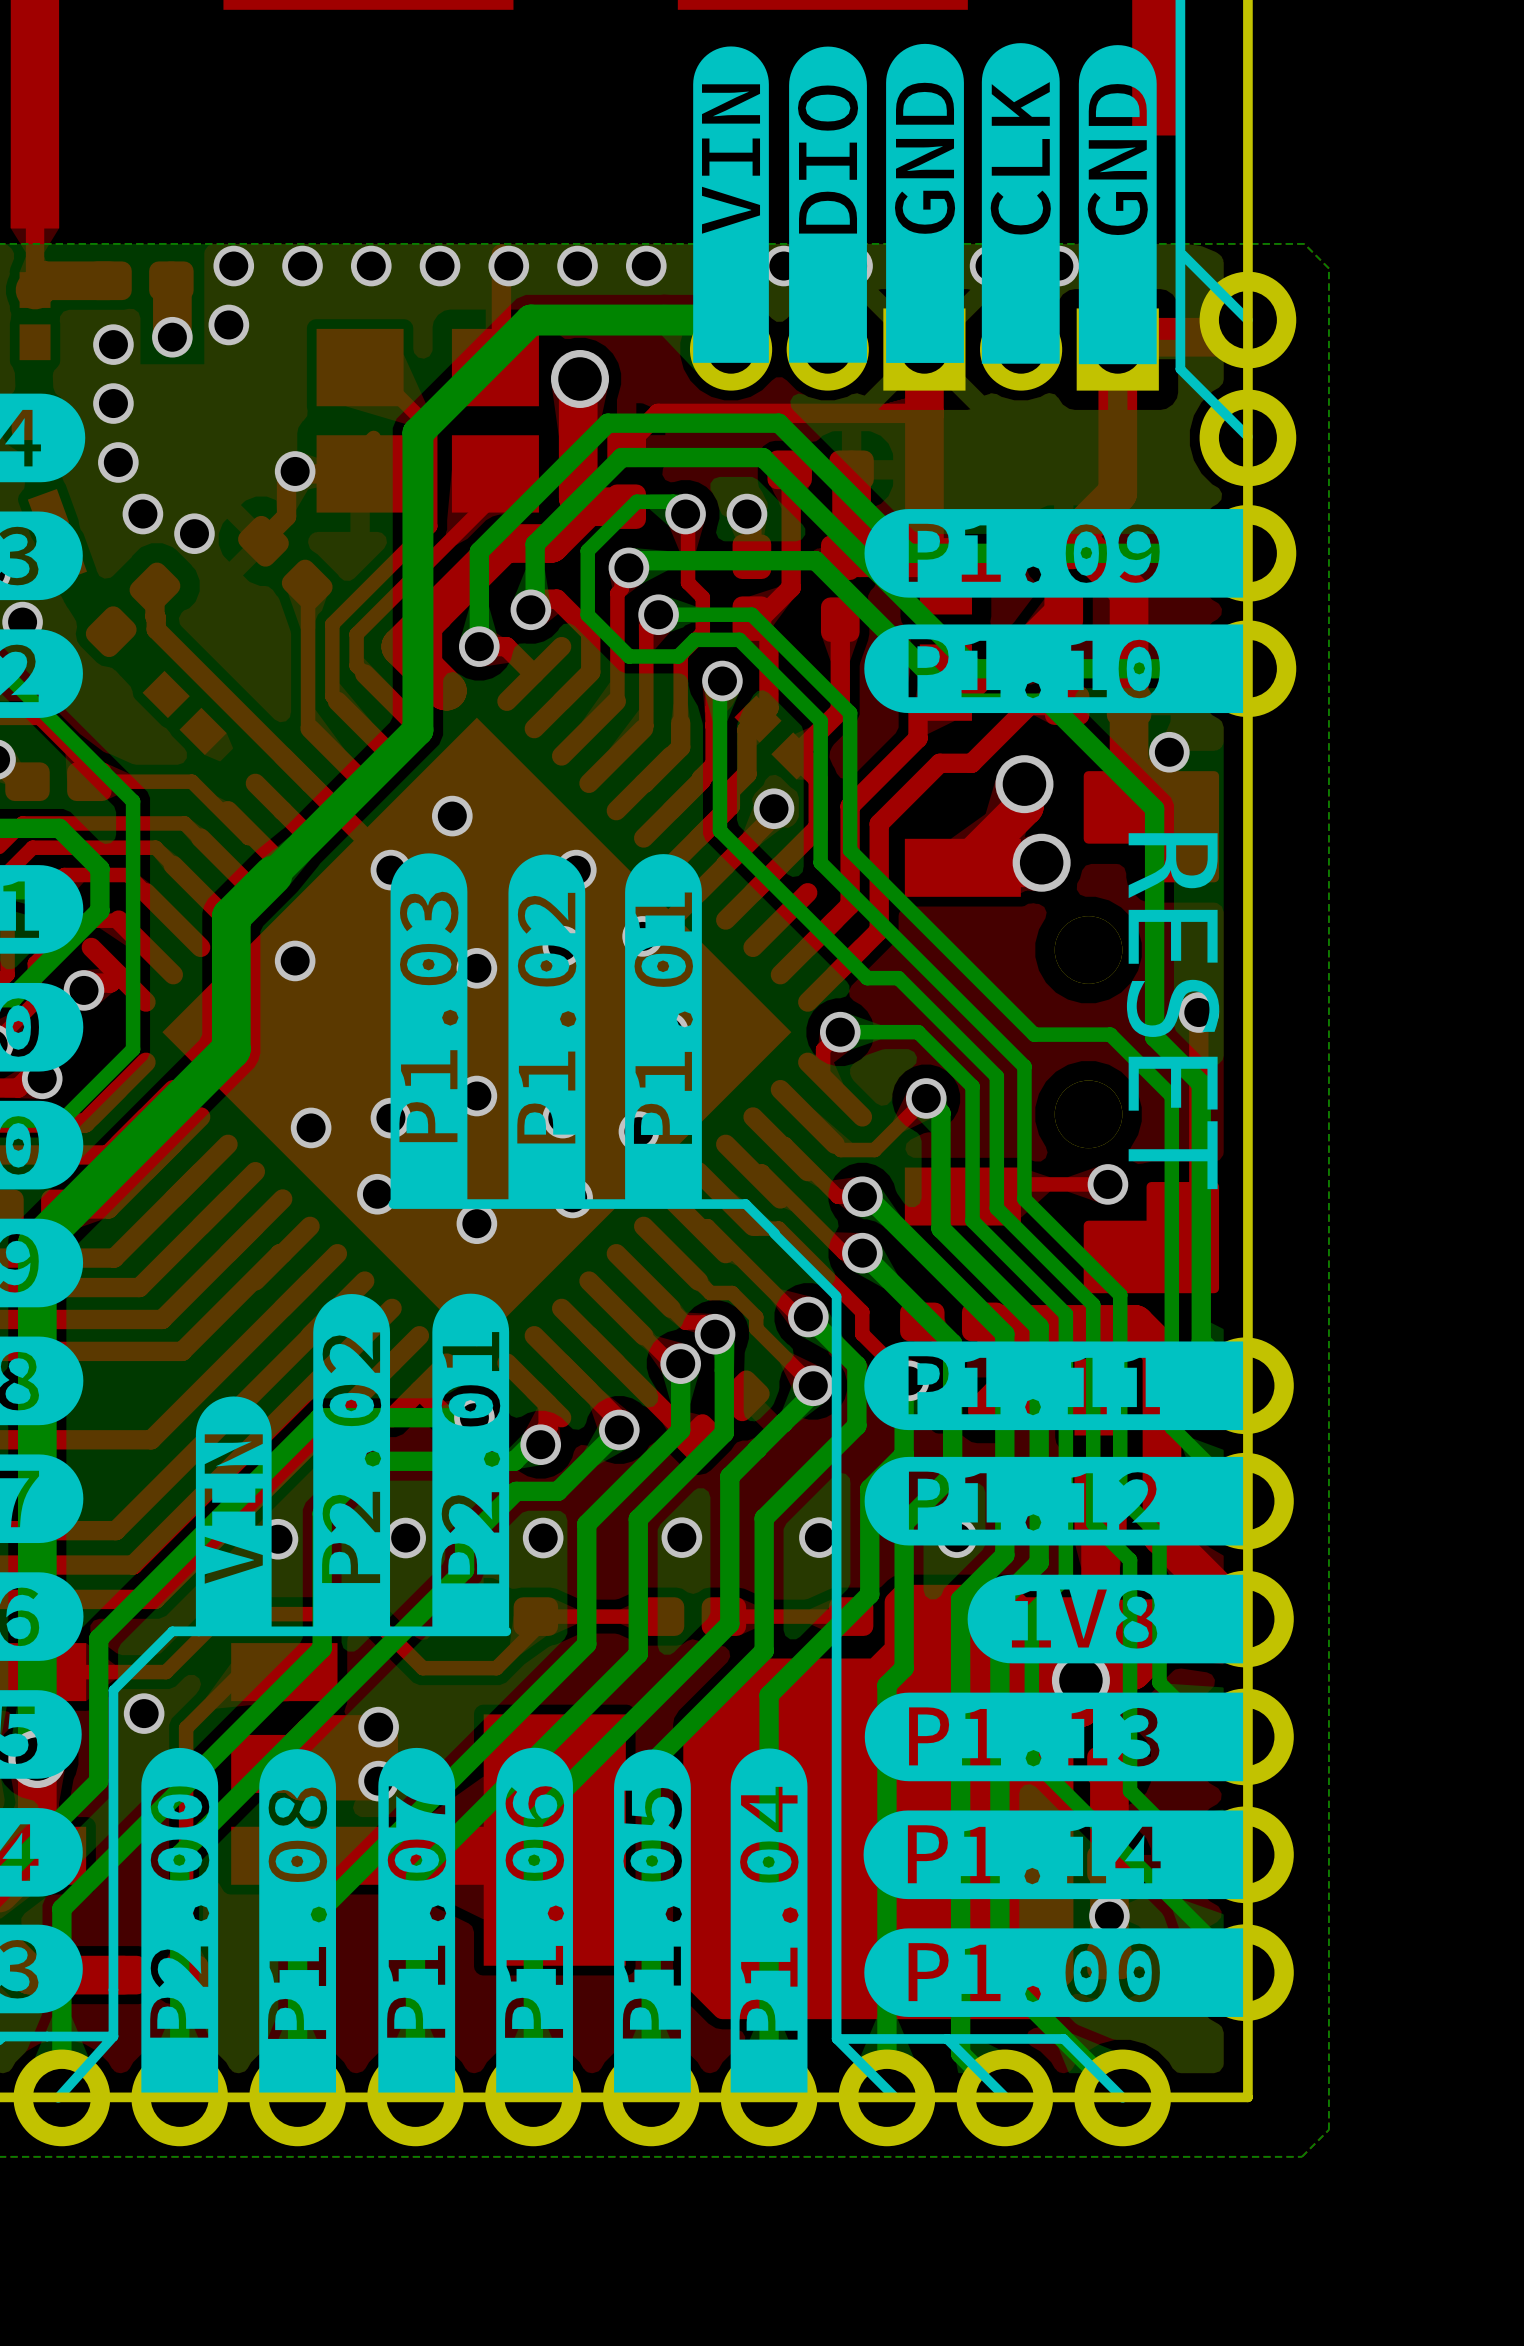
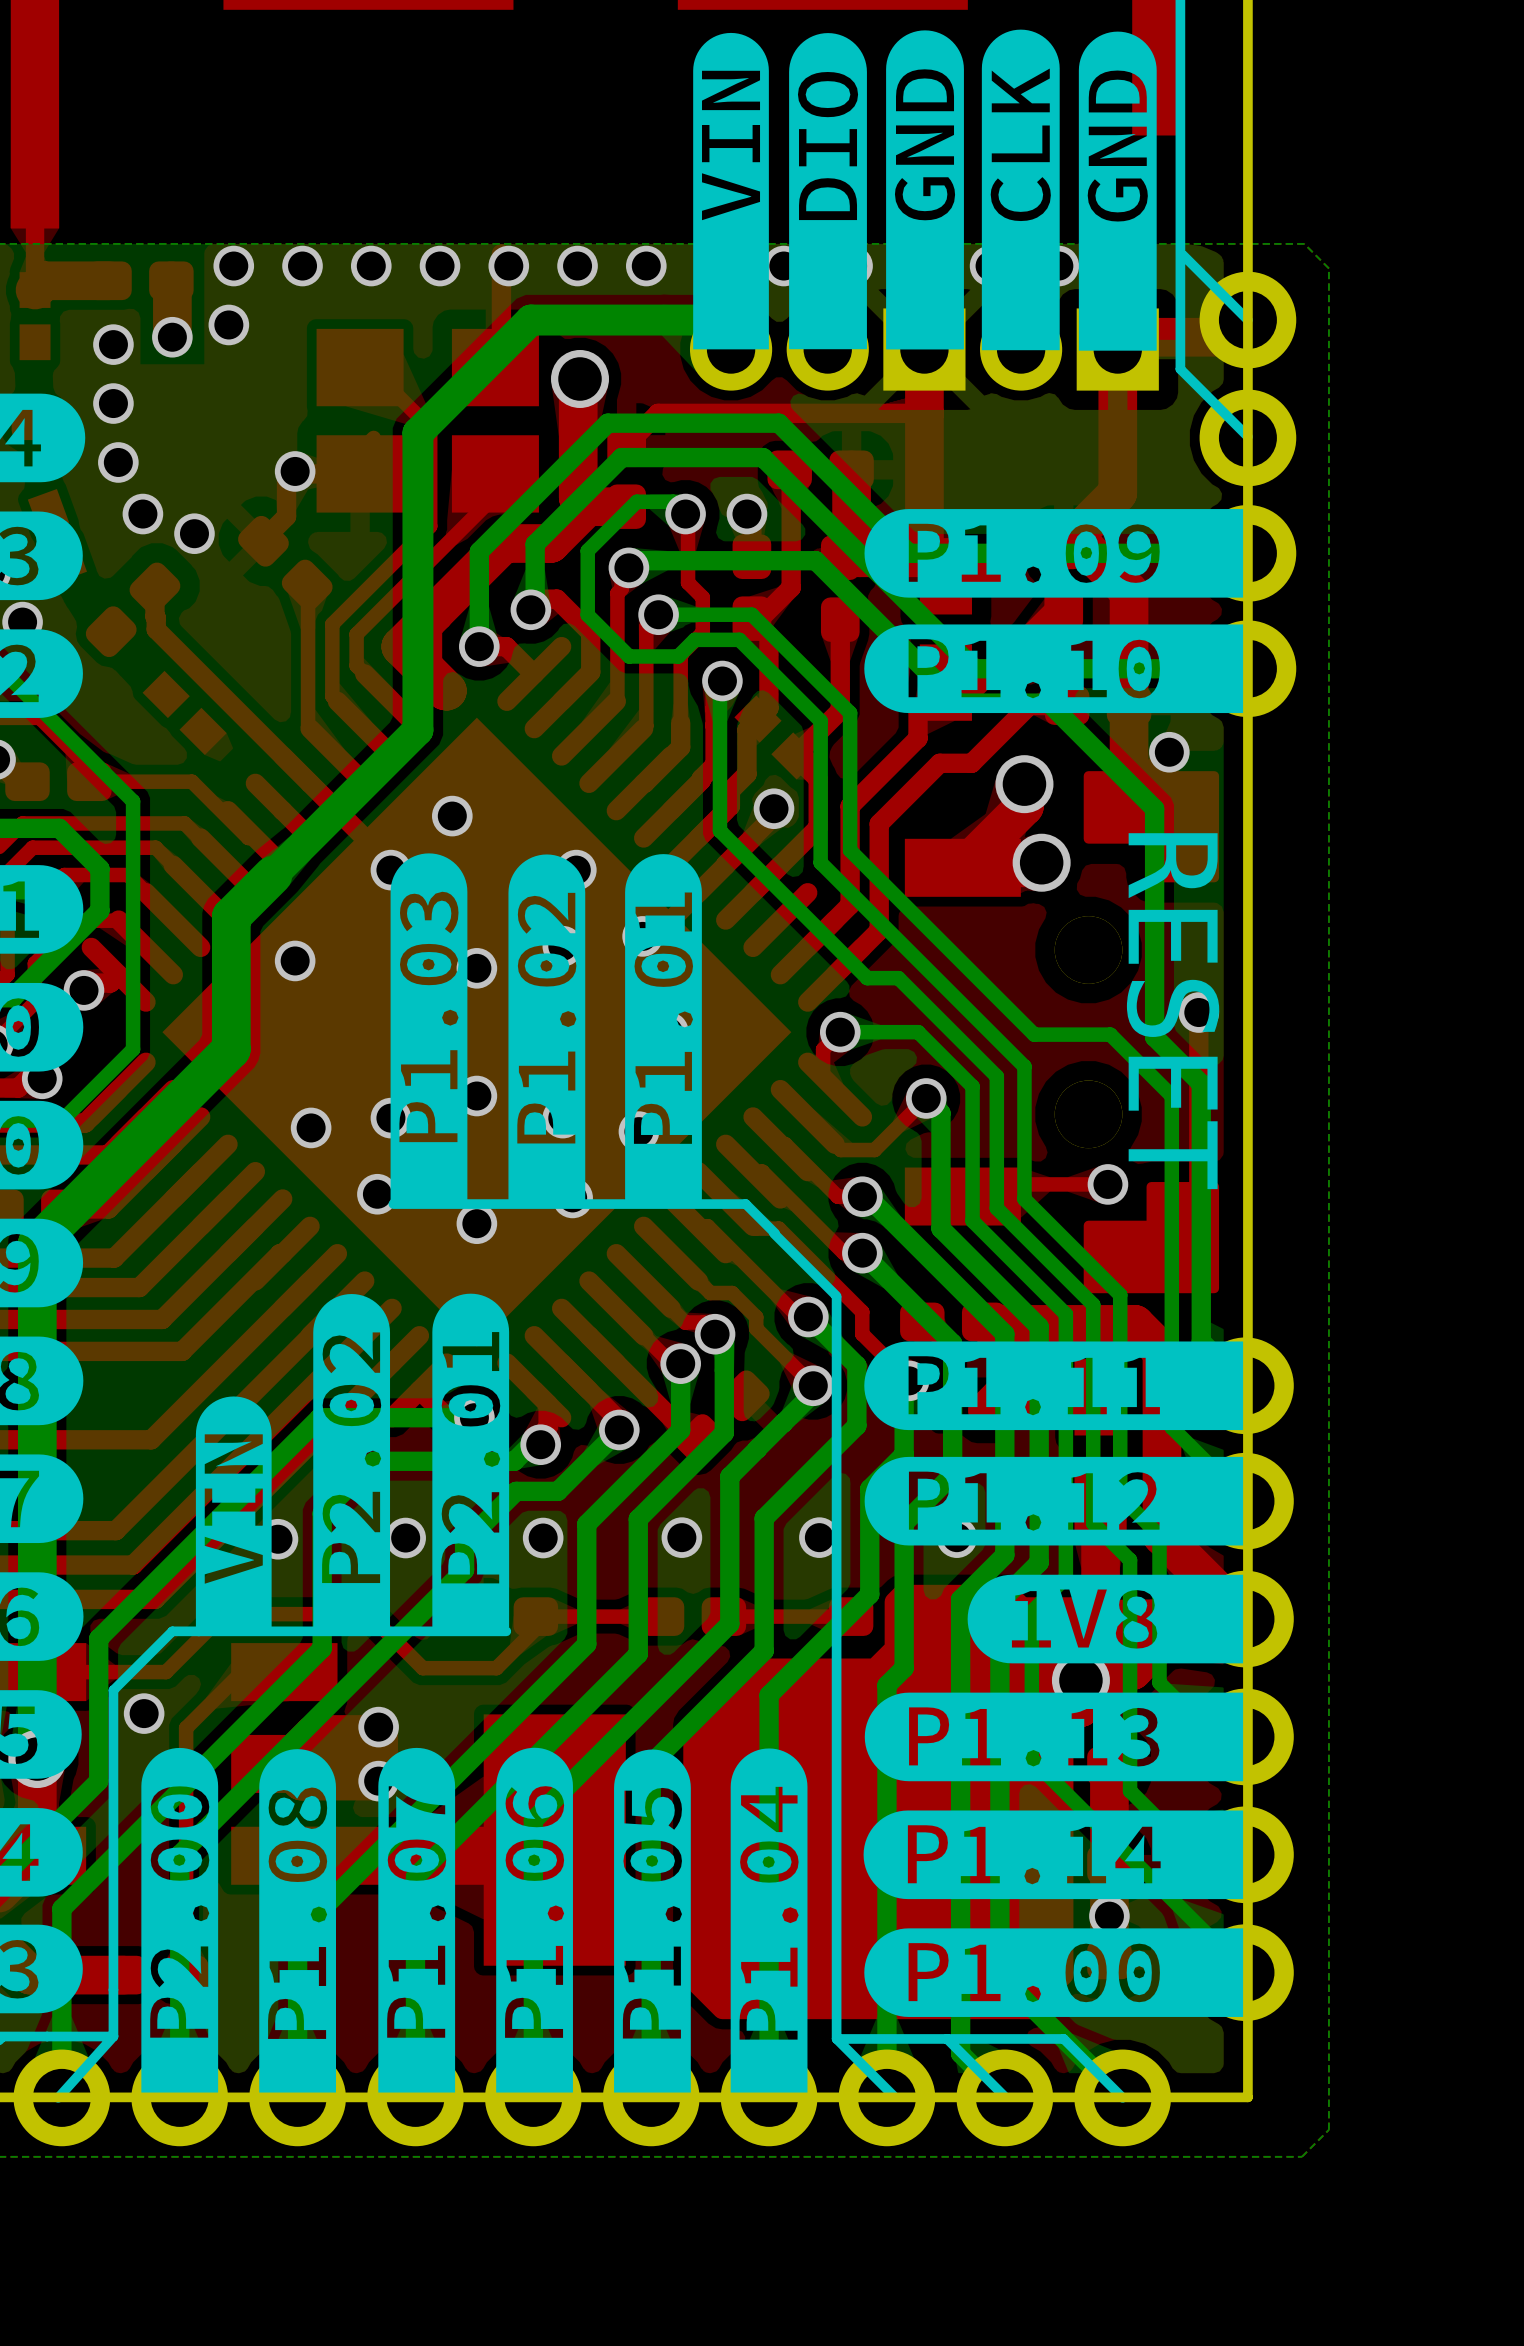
drawing position: (925, 203) -> (925, 189)
drawing position: (1020, 203) -> (1020, 189)
drawing position: (731, 204) -> (731, 191)
drawing position: (828, 204) -> (828, 191)
drawing position: (1117, 204) -> (1117, 191)

